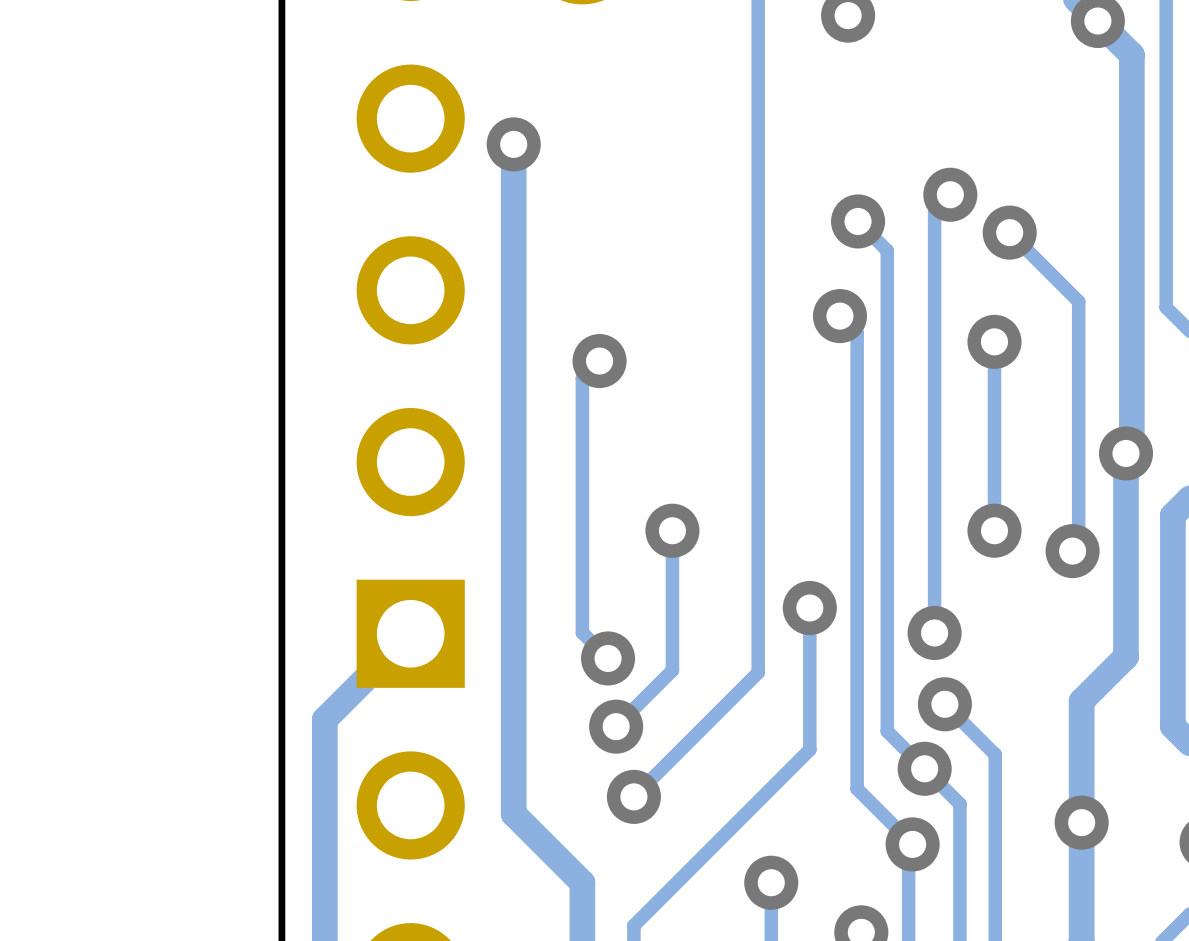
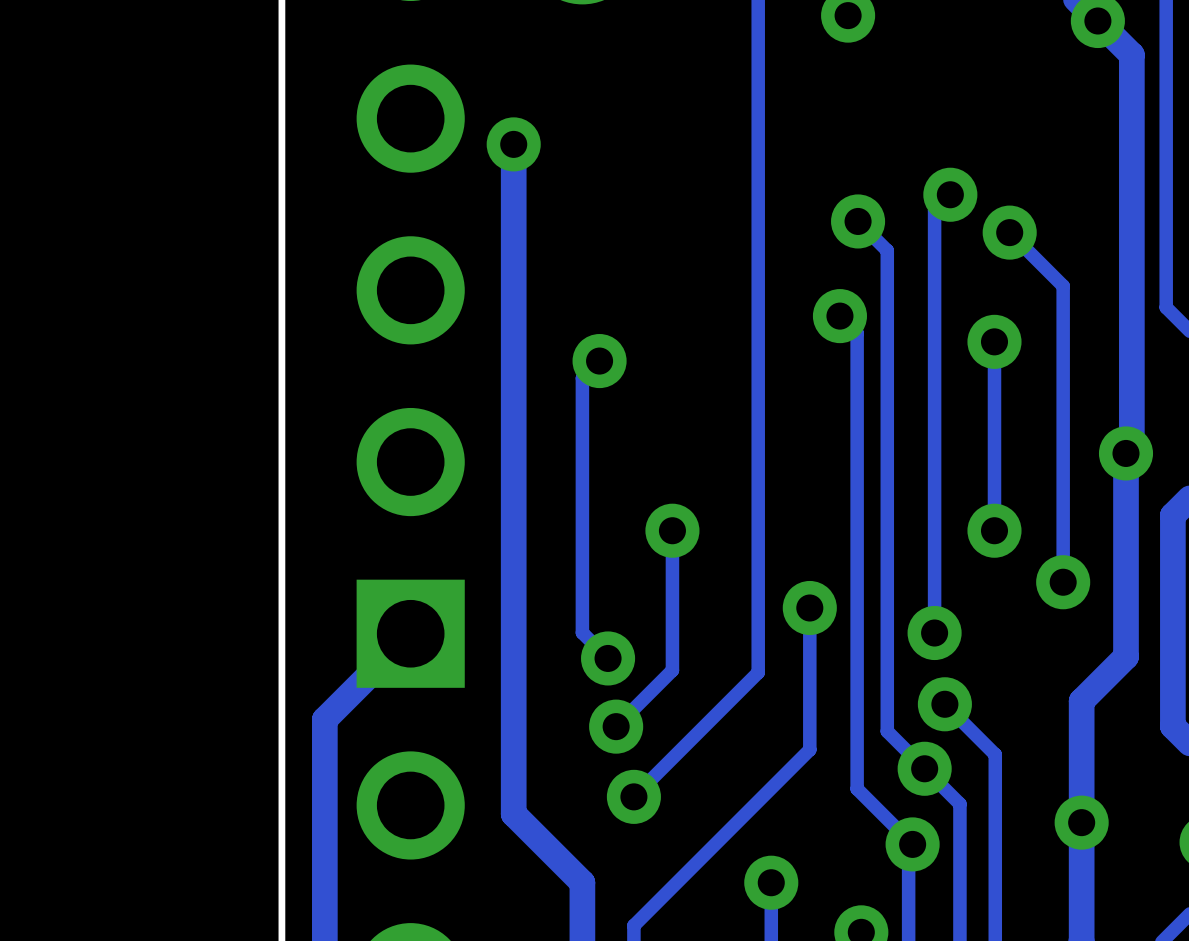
track: (1063, 286) (1078, 301) (1078, 545) (1072, 551) -> (1063, 286) (1063, 582)
via position: (1072, 551) -> (1063, 582)

